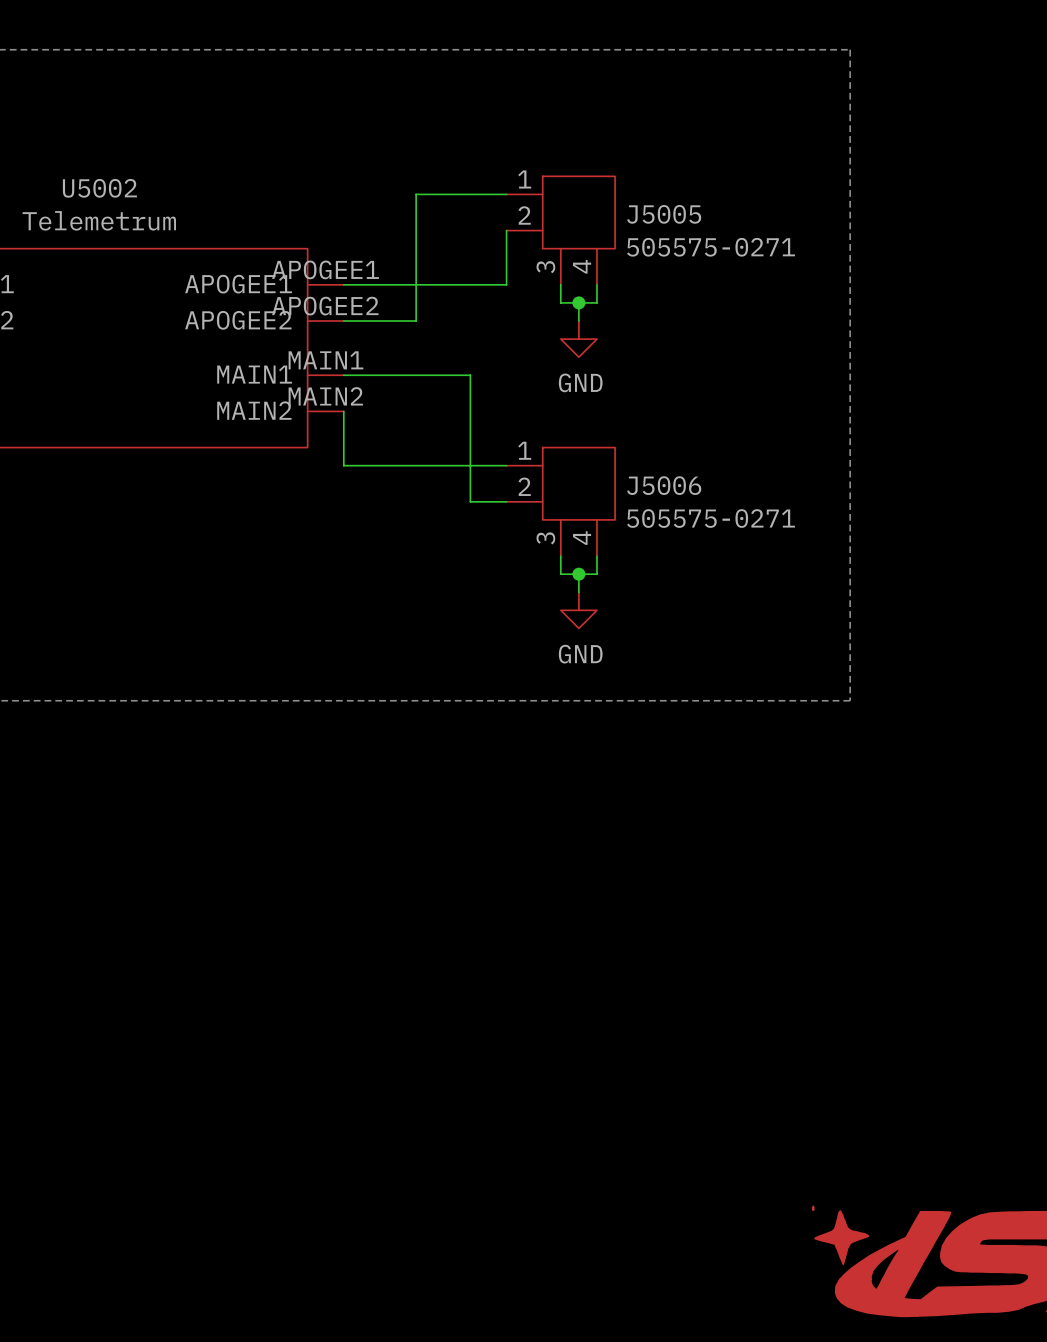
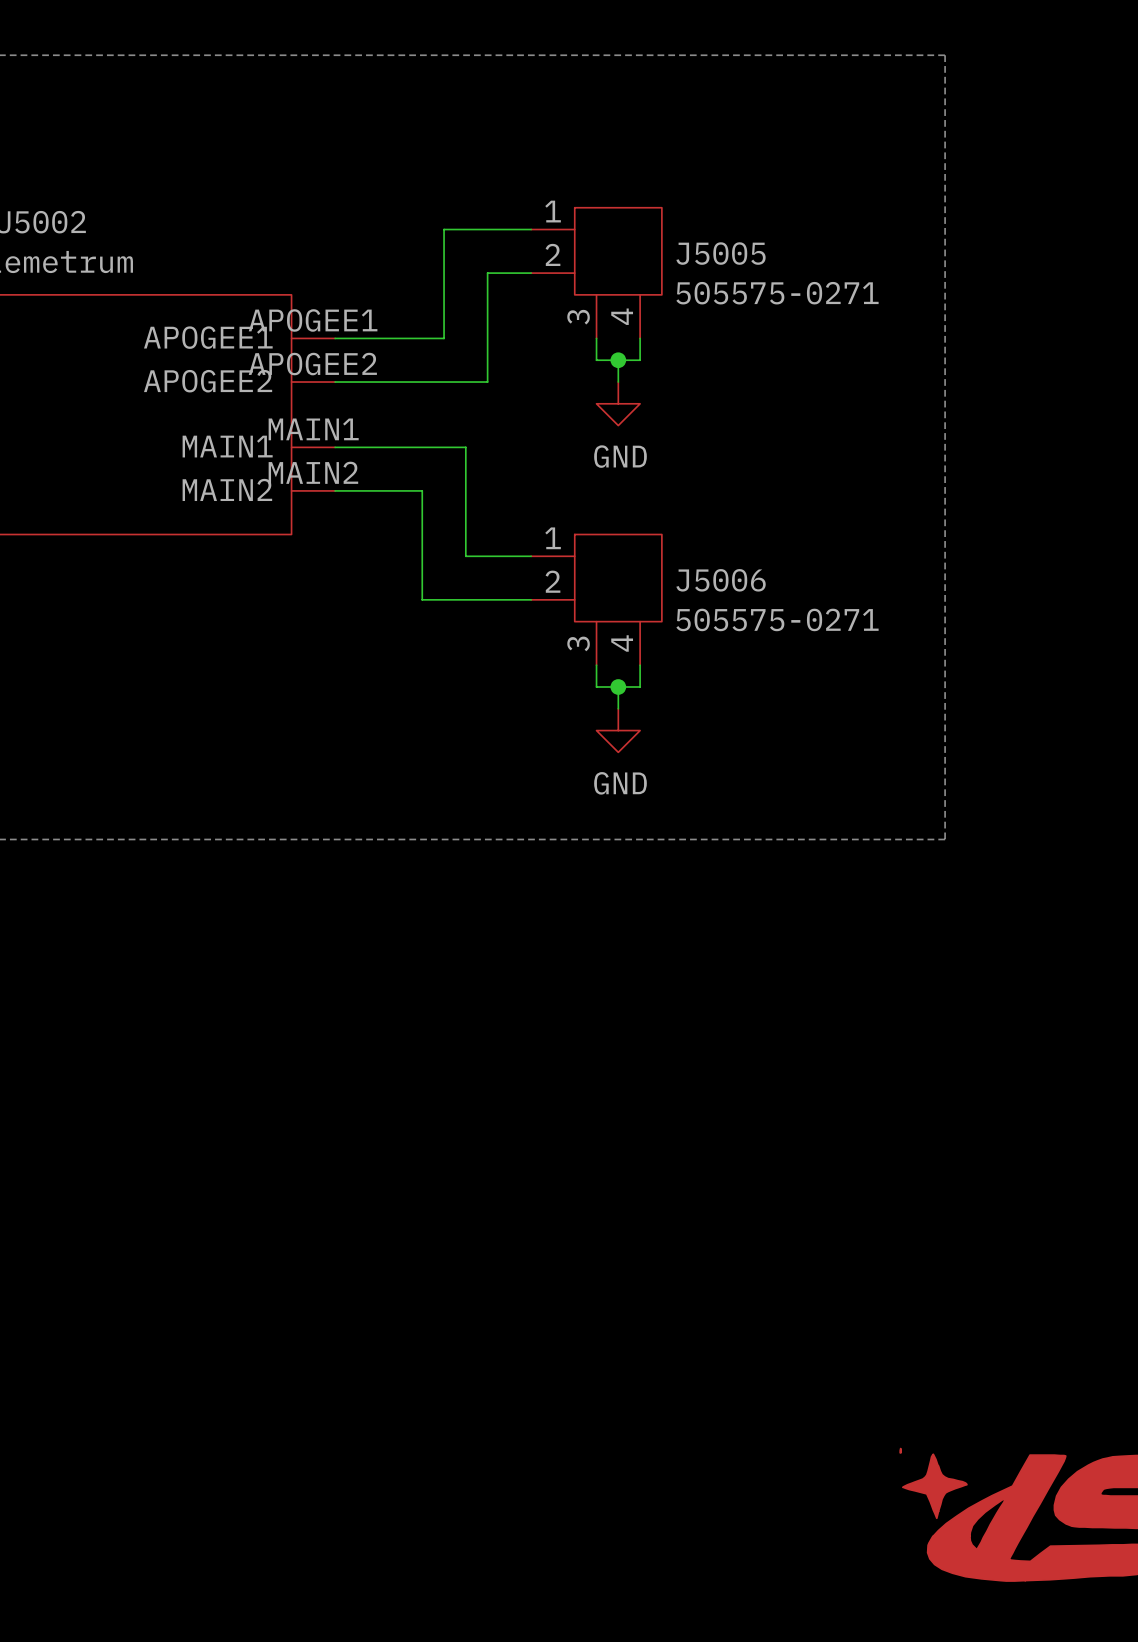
wire: (434, 194) (416, 194) (416, 321) -> (444, 229) (444, 338)
wire: (506, 230) (506, 284) (434, 284) -> (531, 273) (487, 273) (487, 382) (422, 382)
wire: (452, 375) (470, 375) (470, 501) -> (465, 447) (465, 556)
wire: (343, 411) (343, 465) (452, 465) -> (335, 490) (422, 490) (422, 599) (487, 599)

